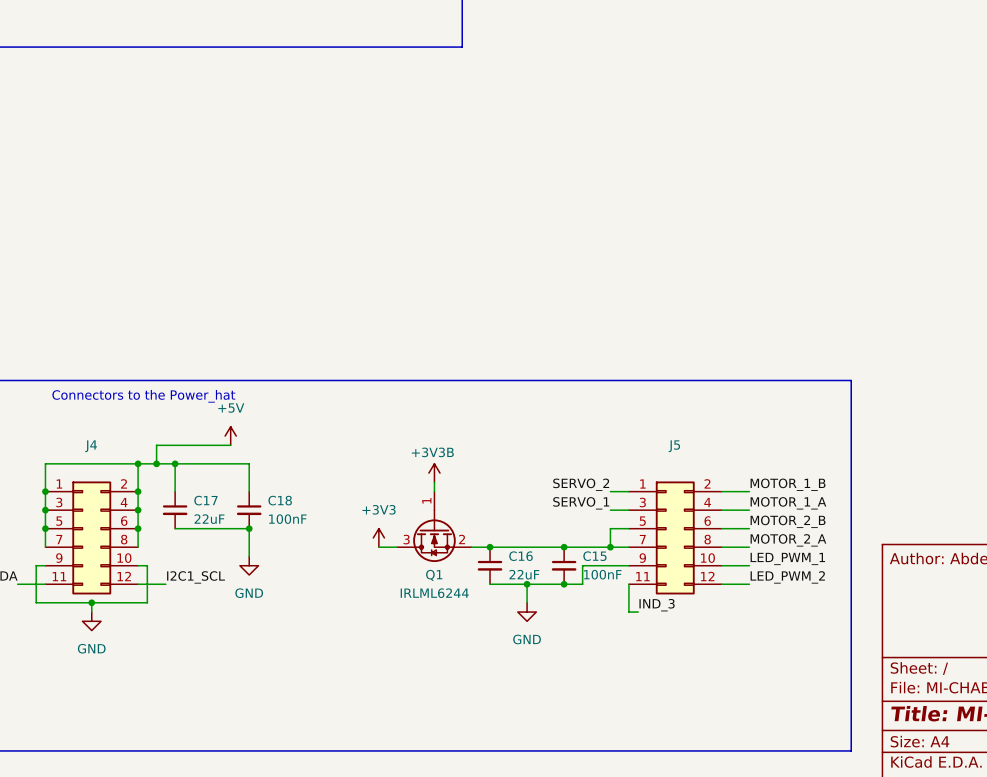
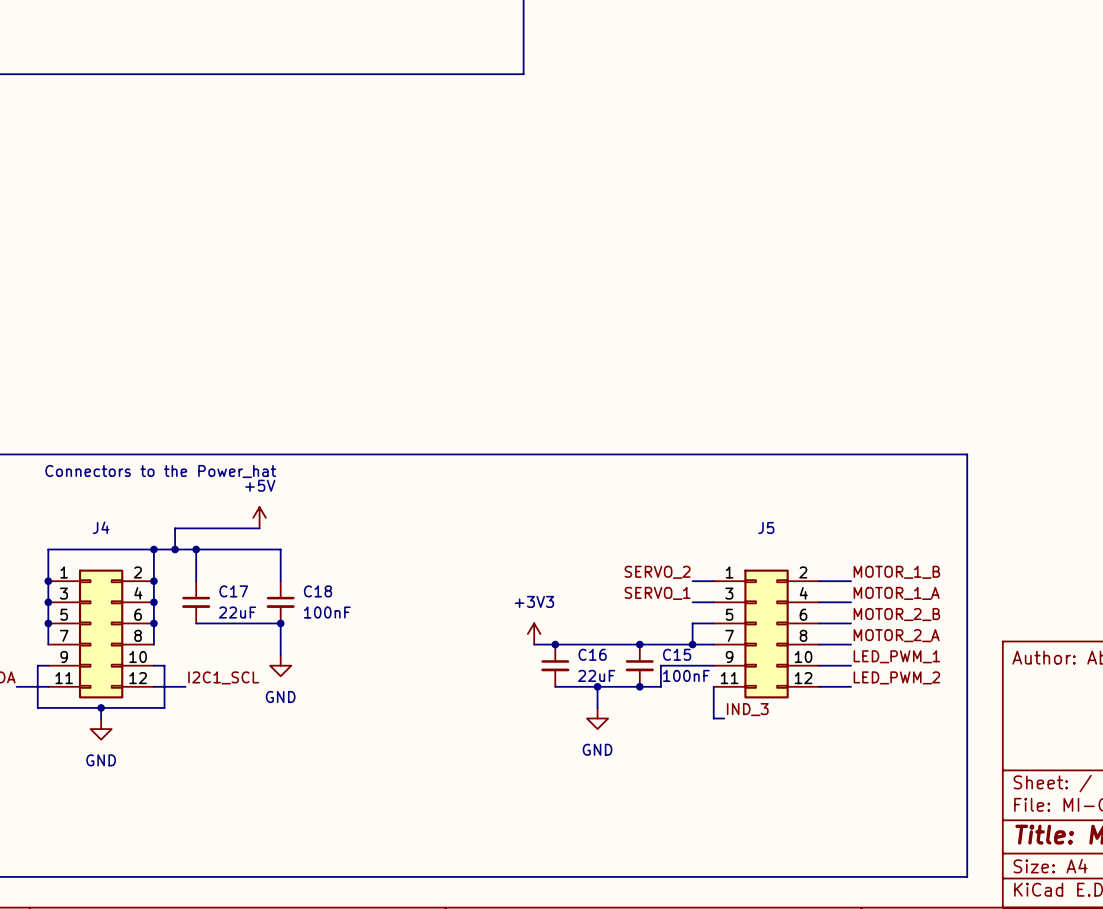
power symbol: +3V3B (434, 473) -> none
wire: (434, 482) (434, 491) -> none
Q1: IRLML6244 (434, 526) -> none
power symbol position: +3V3 (378, 537) -> +3V3 (534, 634)
wire: (378, 547) (397, 547) -> none

